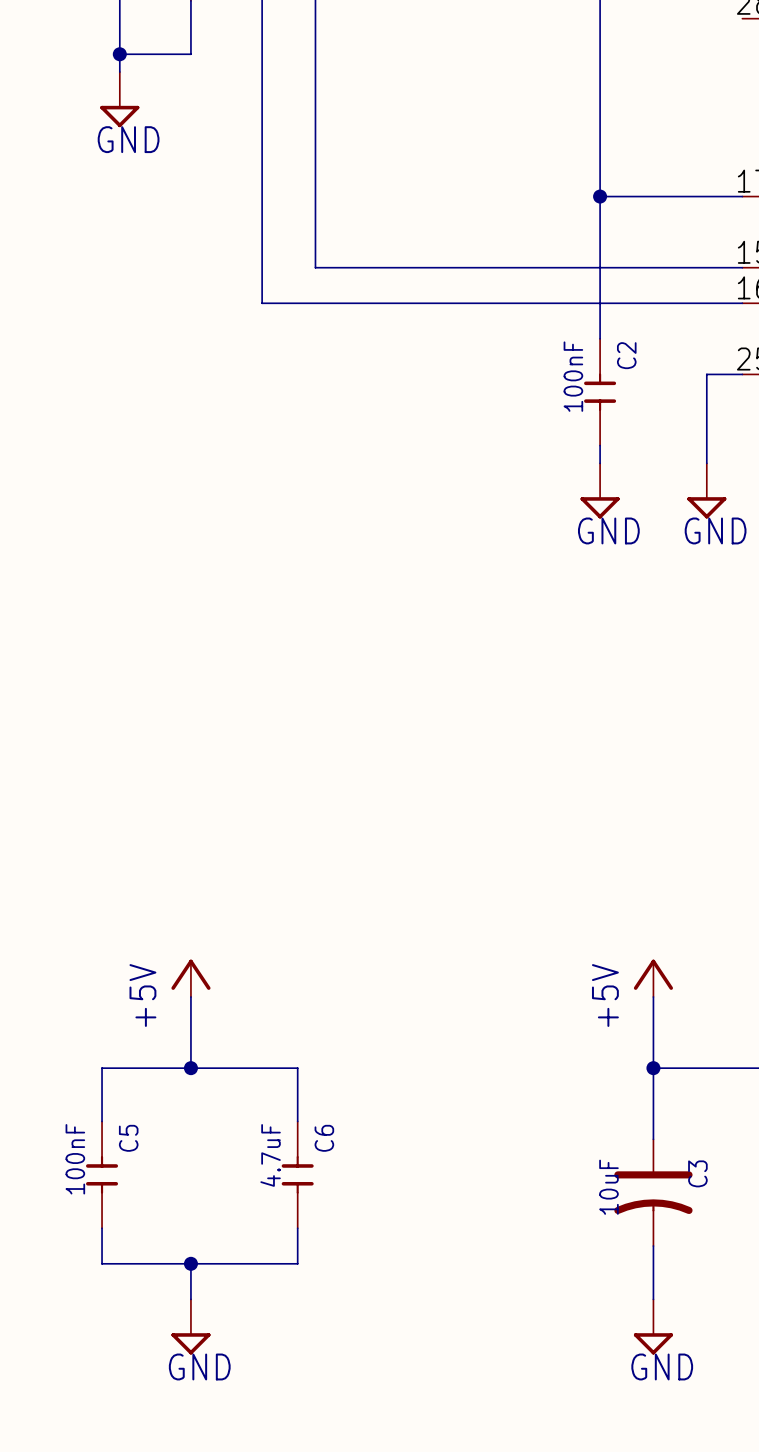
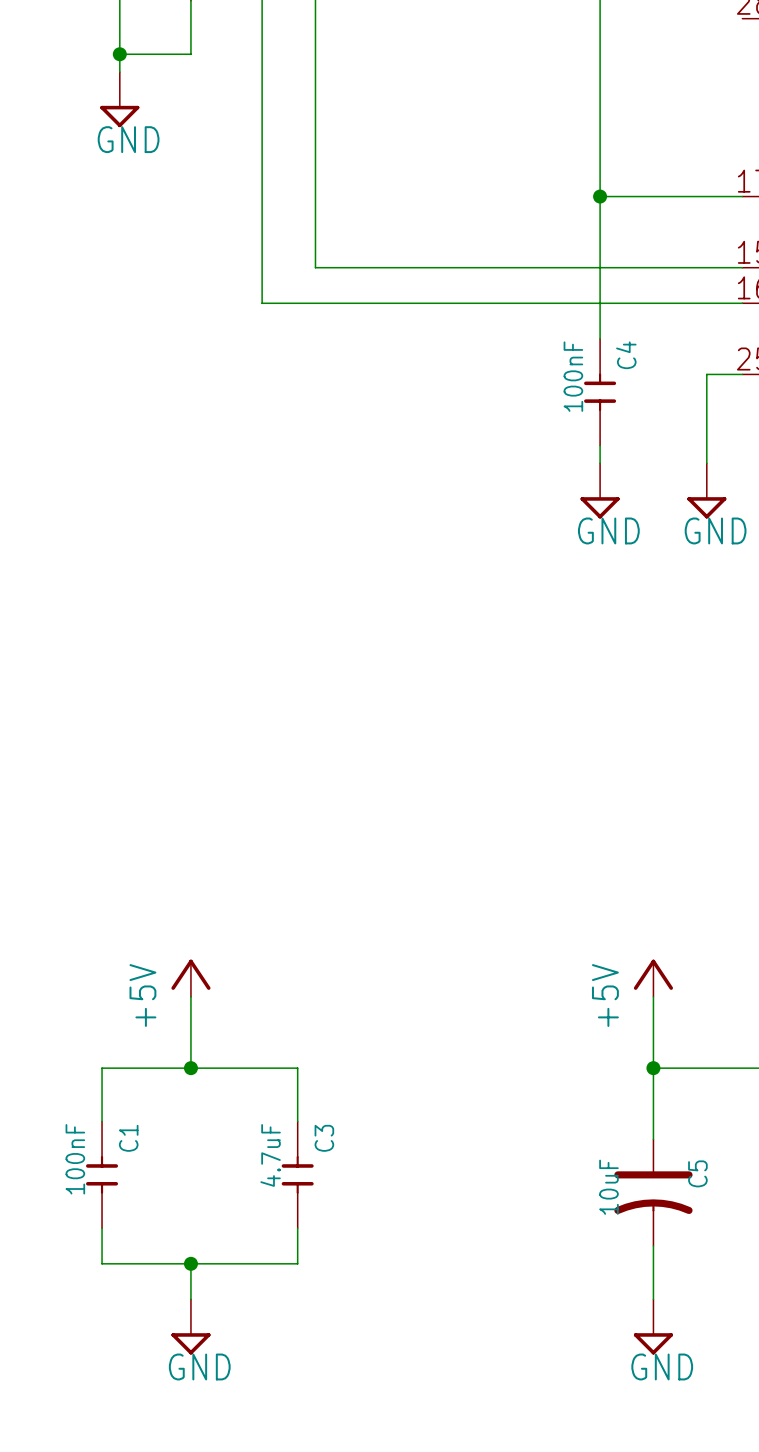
C2 name: C2 (626, 355) -> C4 (626, 355)
C5 name: C5 (128, 1138) -> C1 (128, 1138)
C6 name: C6 (324, 1138) -> C3 (324, 1138)
C3 name: C3 (697, 1173) -> C5 (697, 1173)

